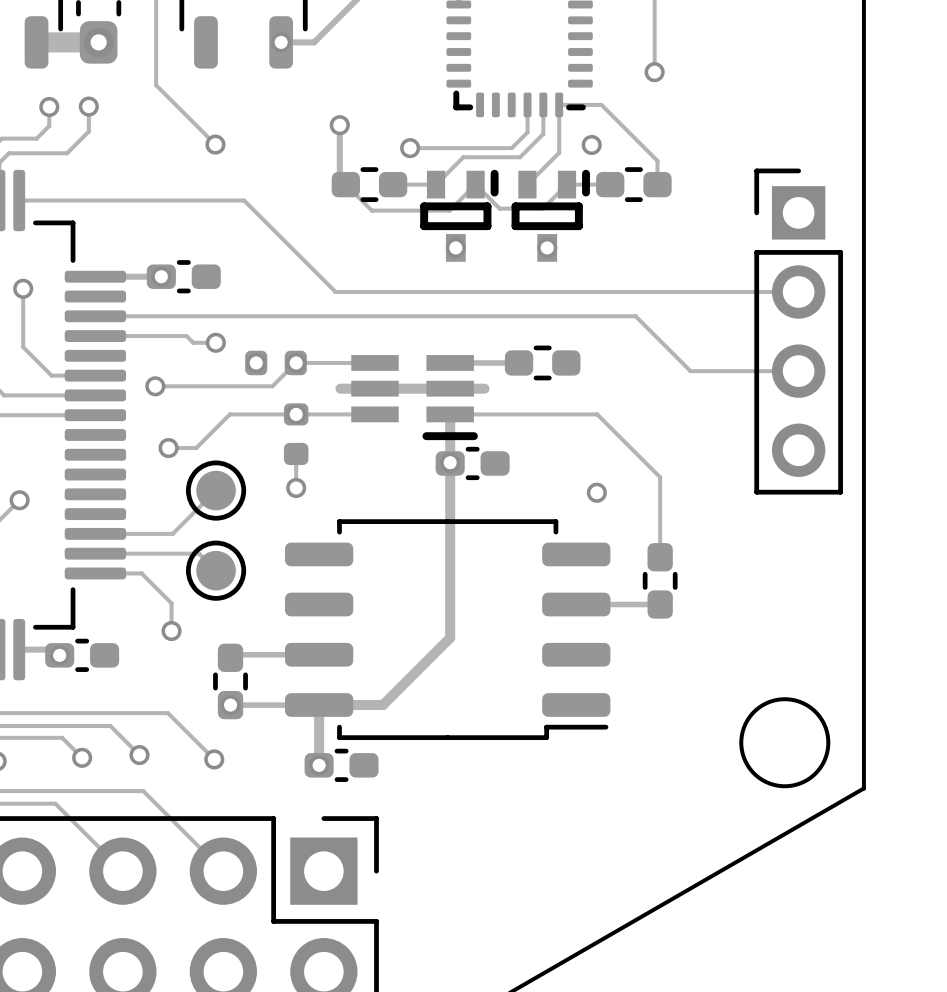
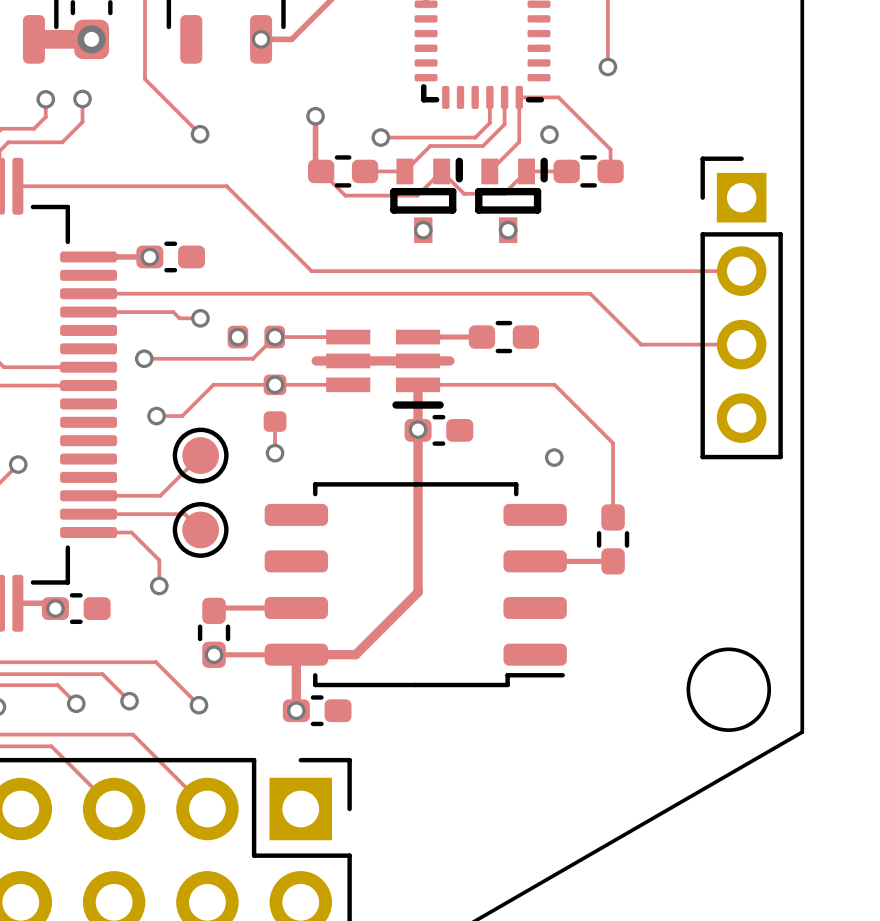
track: (23, 288) (23, 347) (51, 375) (95, 375) -> none
via: (23, 288) -> none

